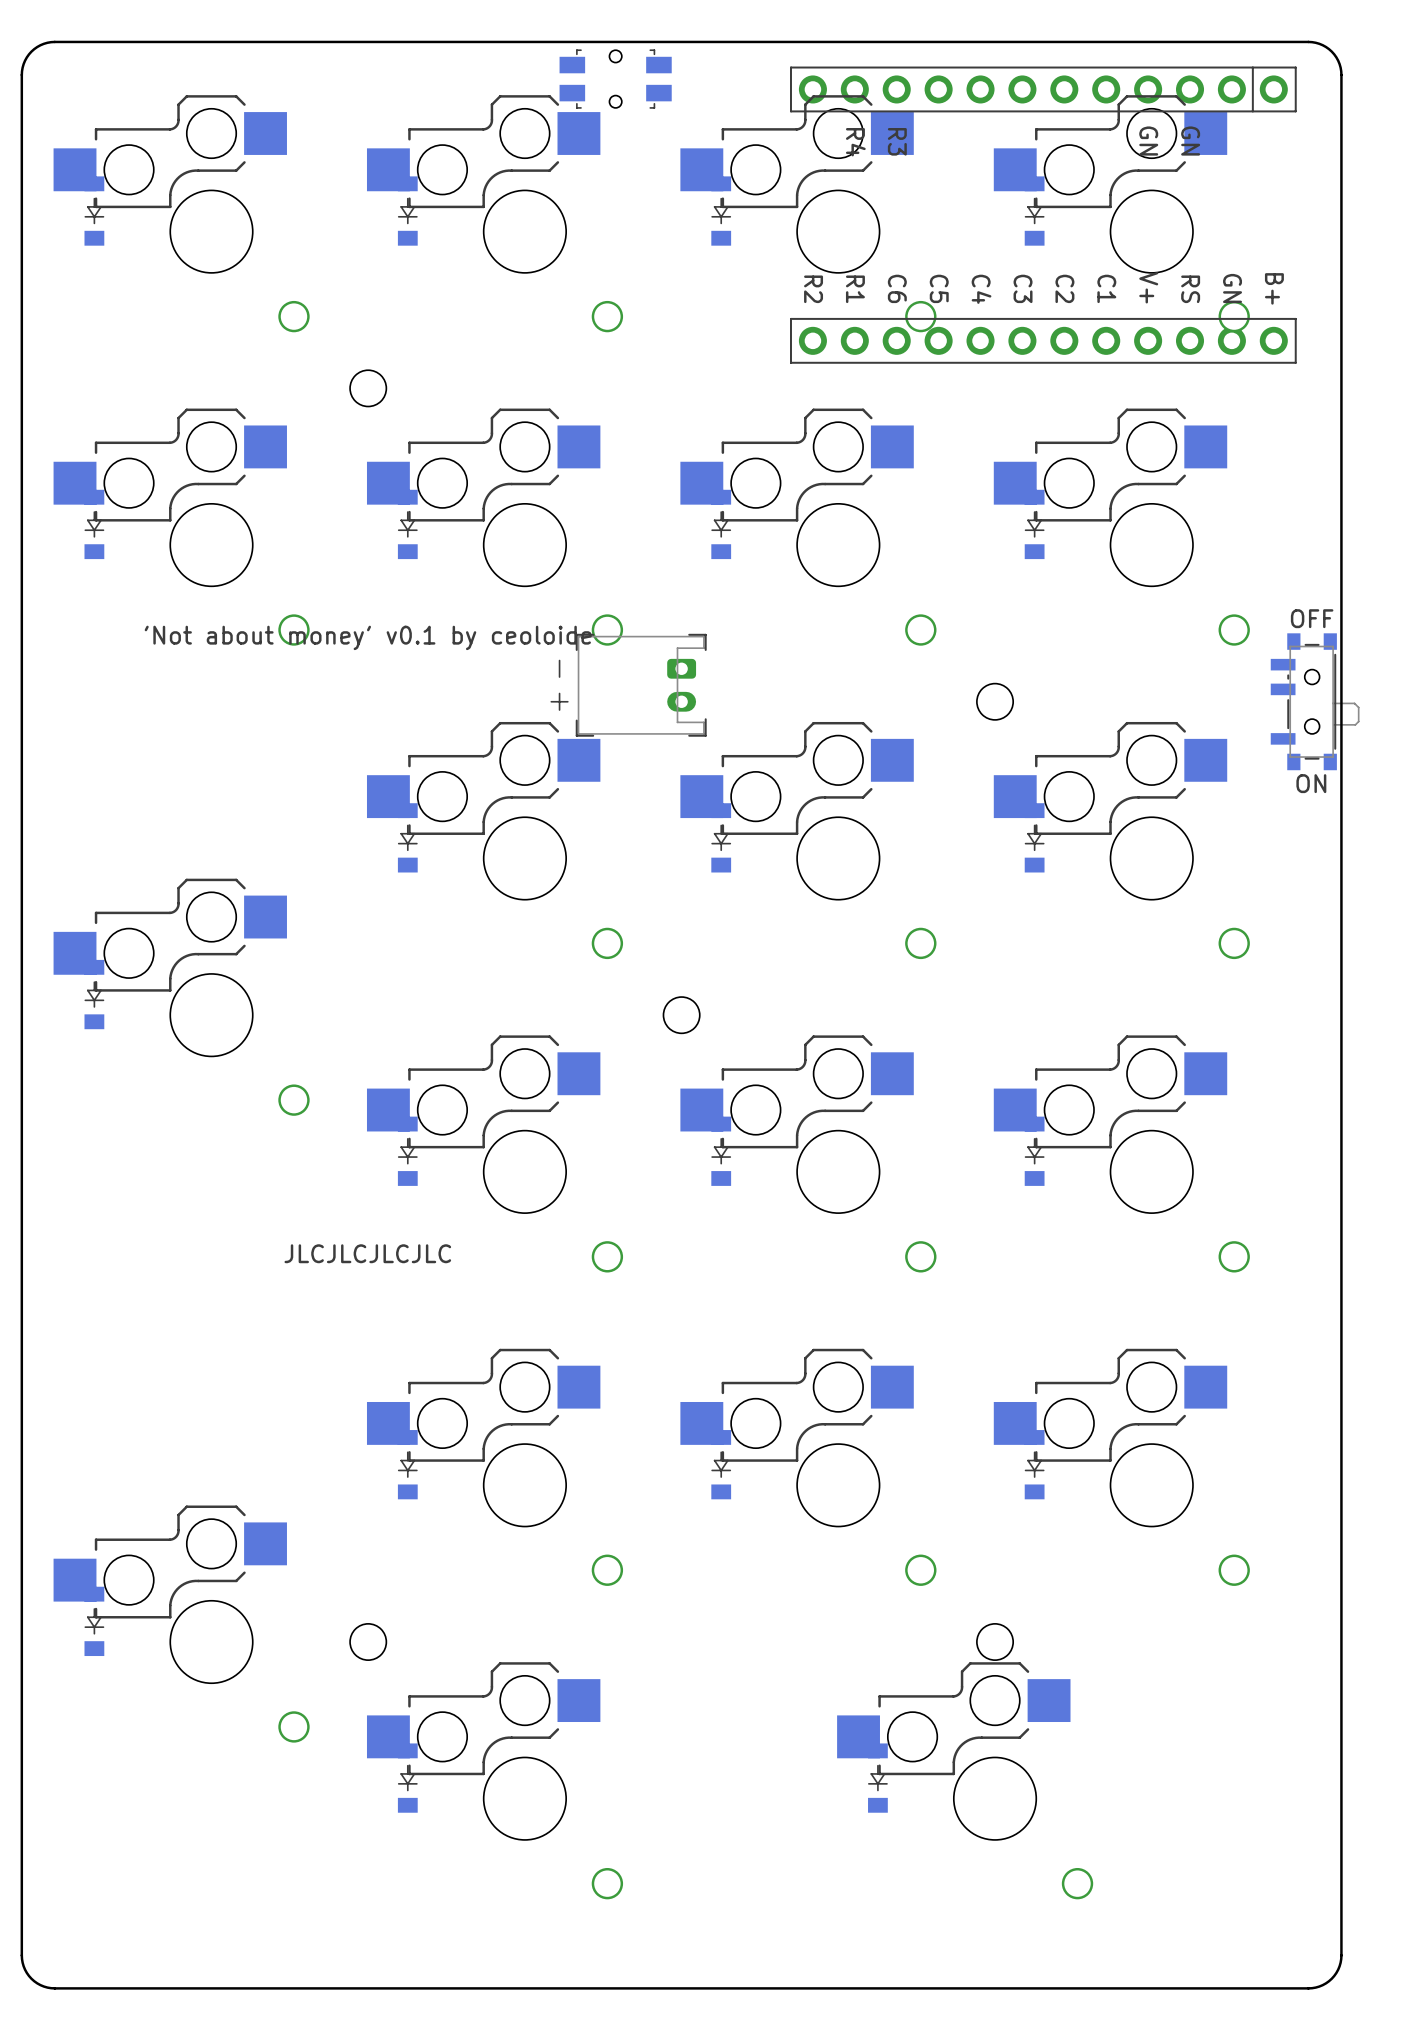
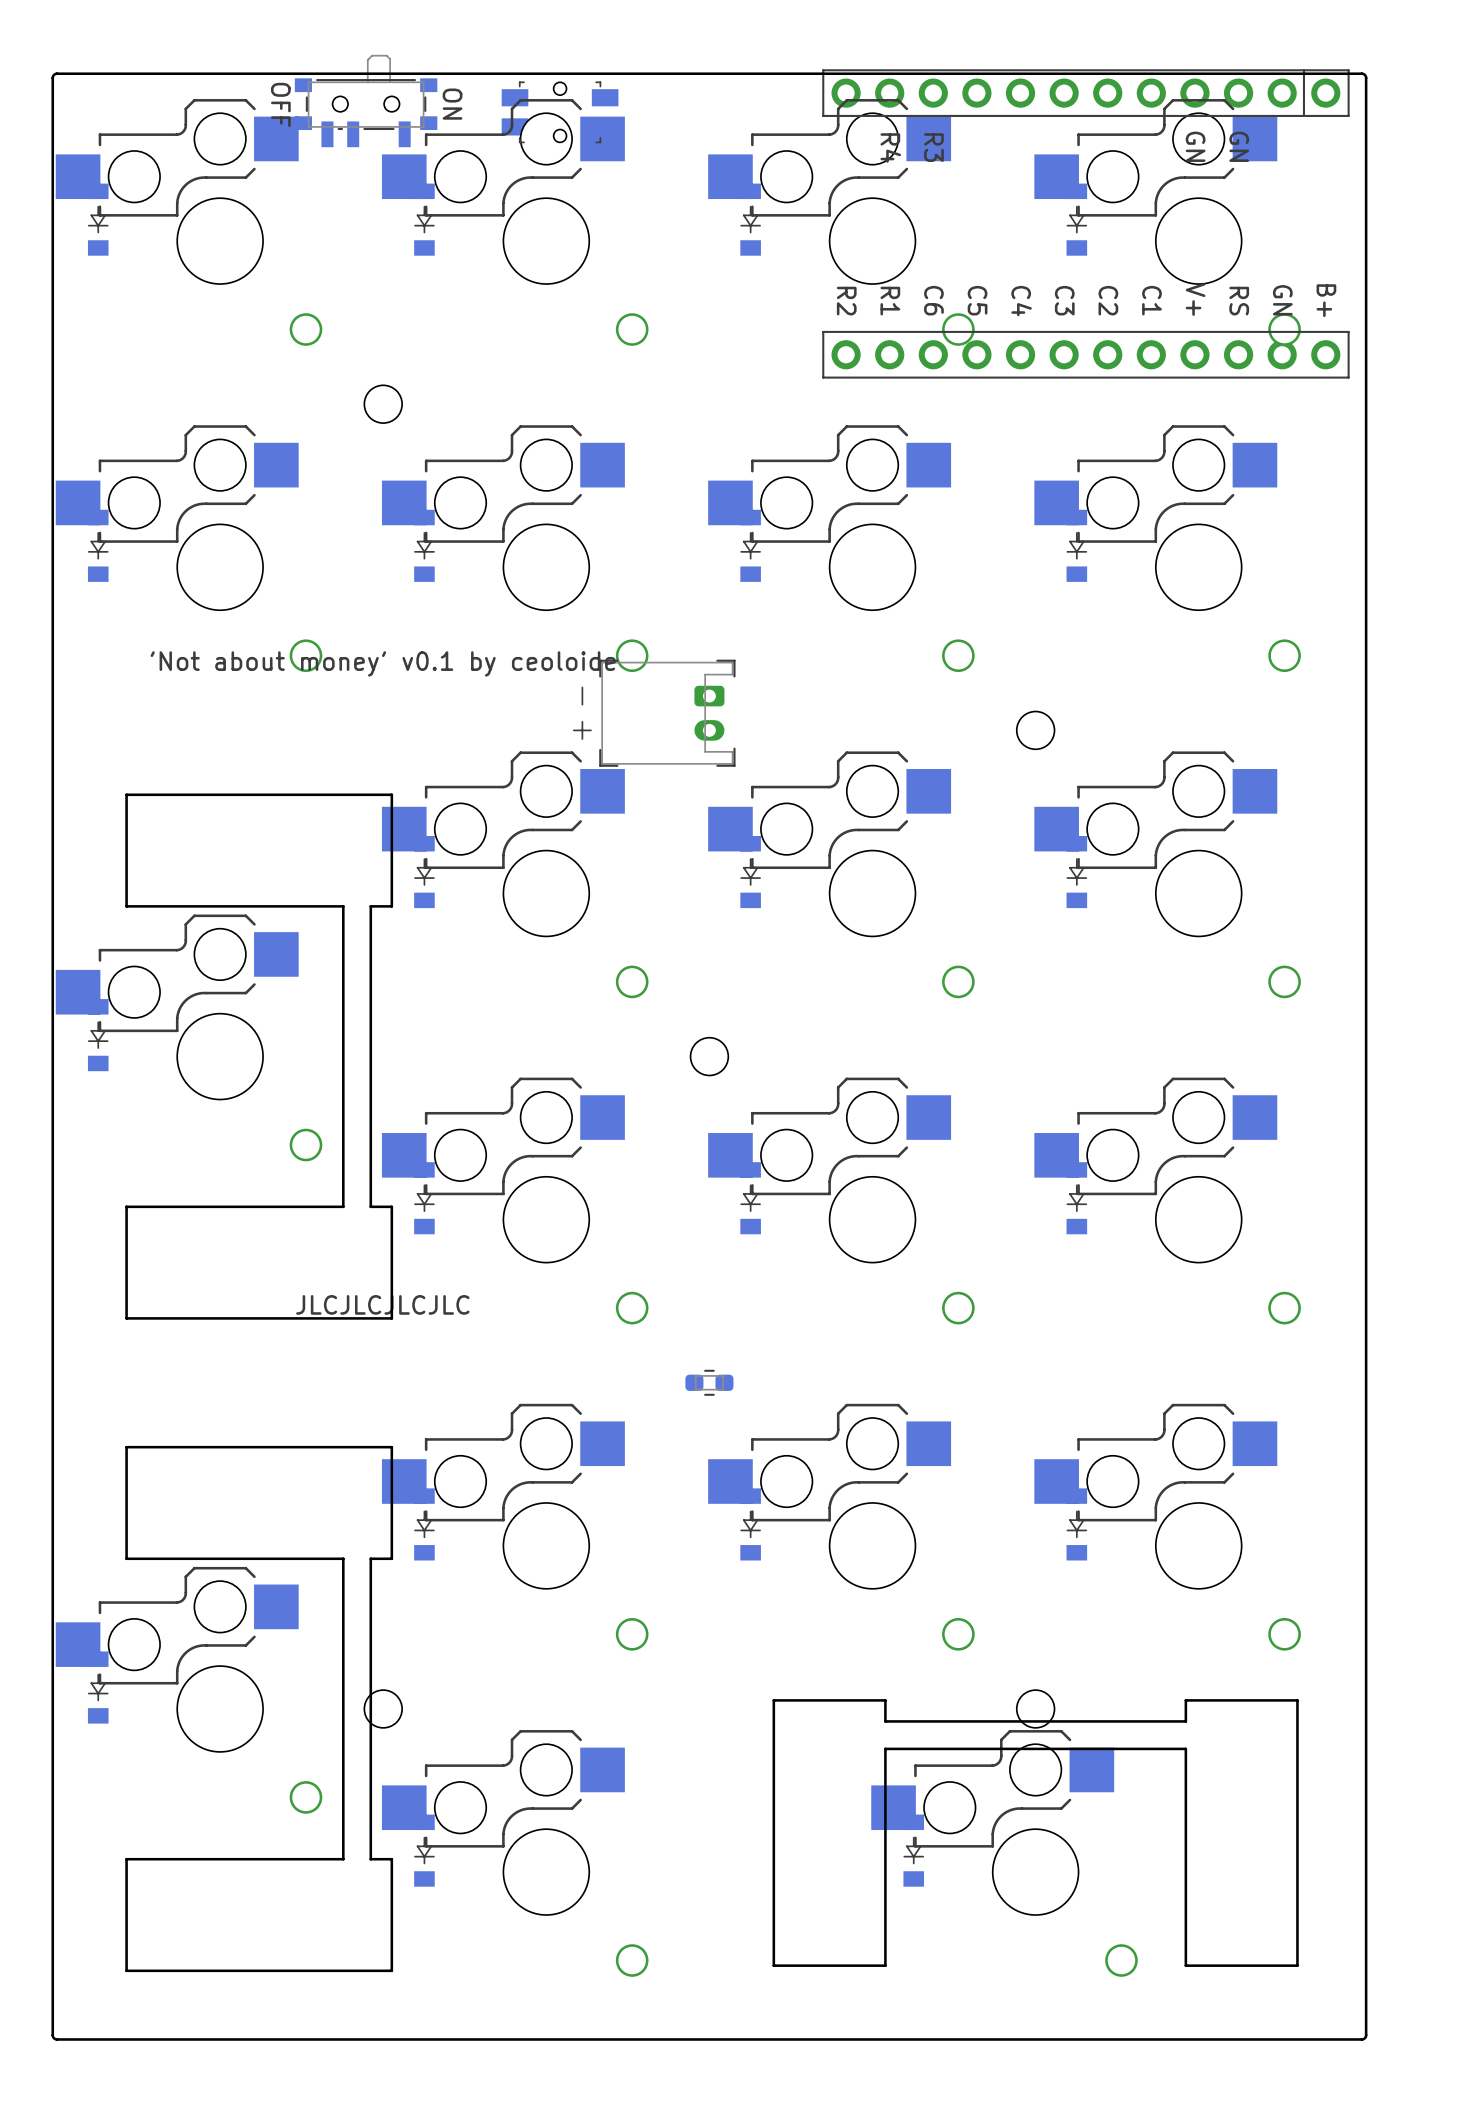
board edge: (1308, 41) (54, 41) (37, 47) (26, 57) (21, 74) (21, 1955) (26, 1972) (37, 1983) (54, 1988) (1308, 1988) (1322, 1985) (1336, 1972) (1341, 1955) (1341, 74) (1338, 60) (1331, 51) (1319, 43) (1308, 41) -> (1361, 73) (1366, 78) (1365, 2037) (1361, 2039) (54, 2038) (52, 2035) (53, 75) (57, 73) (1361, 73)
part position: (615, 79) -> (560, 112)
part: none -> (366, 101)
part: (1315, 701) -> none
board edge: none -> (391, 794) (391, 906) (370, 906) (370, 1206) (391, 1206) (391, 1318) (126, 1318) (126, 1206) (343, 1206) (343, 906) (126, 906) (126, 794) (391, 794)
part: none -> (709, 1382)
board edge: none -> (391, 1447) (391, 1558) (370, 1558) (370, 1859) (391, 1859) (391, 1970) (126, 1970) (126, 1859) (343, 1859) (343, 1558) (126, 1558) (126, 1447) (391, 1447)
board edge: none -> (1297, 1700) (1185, 1700) (1185, 1721) (885, 1721) (885, 1700) (773, 1700) (773, 1965) (885, 1965) (885, 1748) (1185, 1748) (1185, 1965) (1297, 1965) (1297, 1700)

